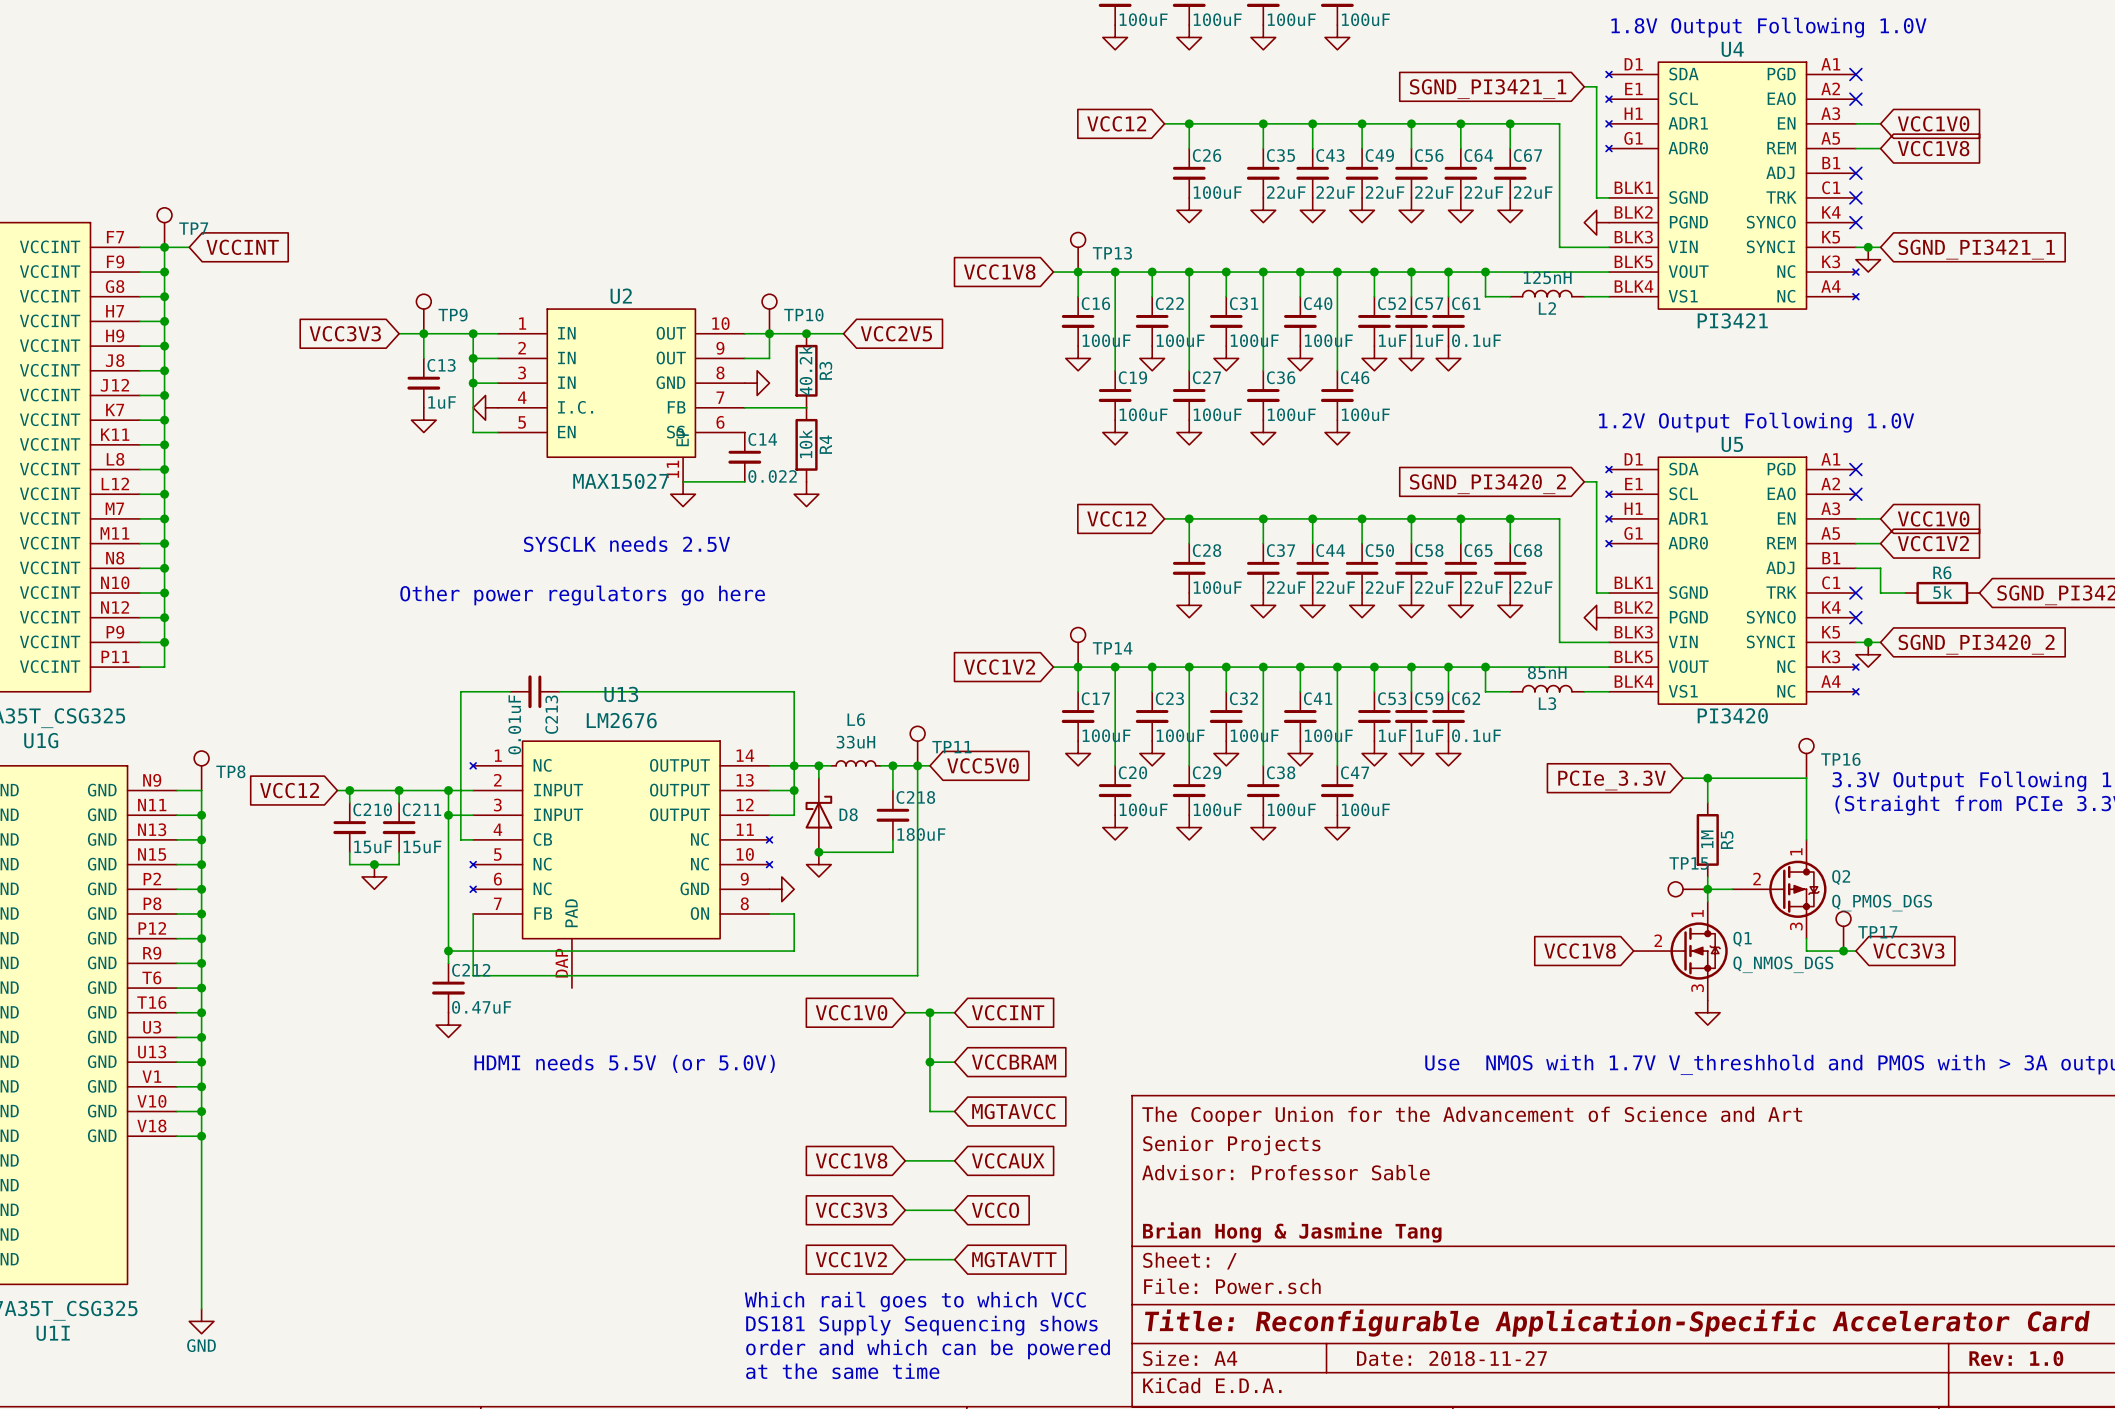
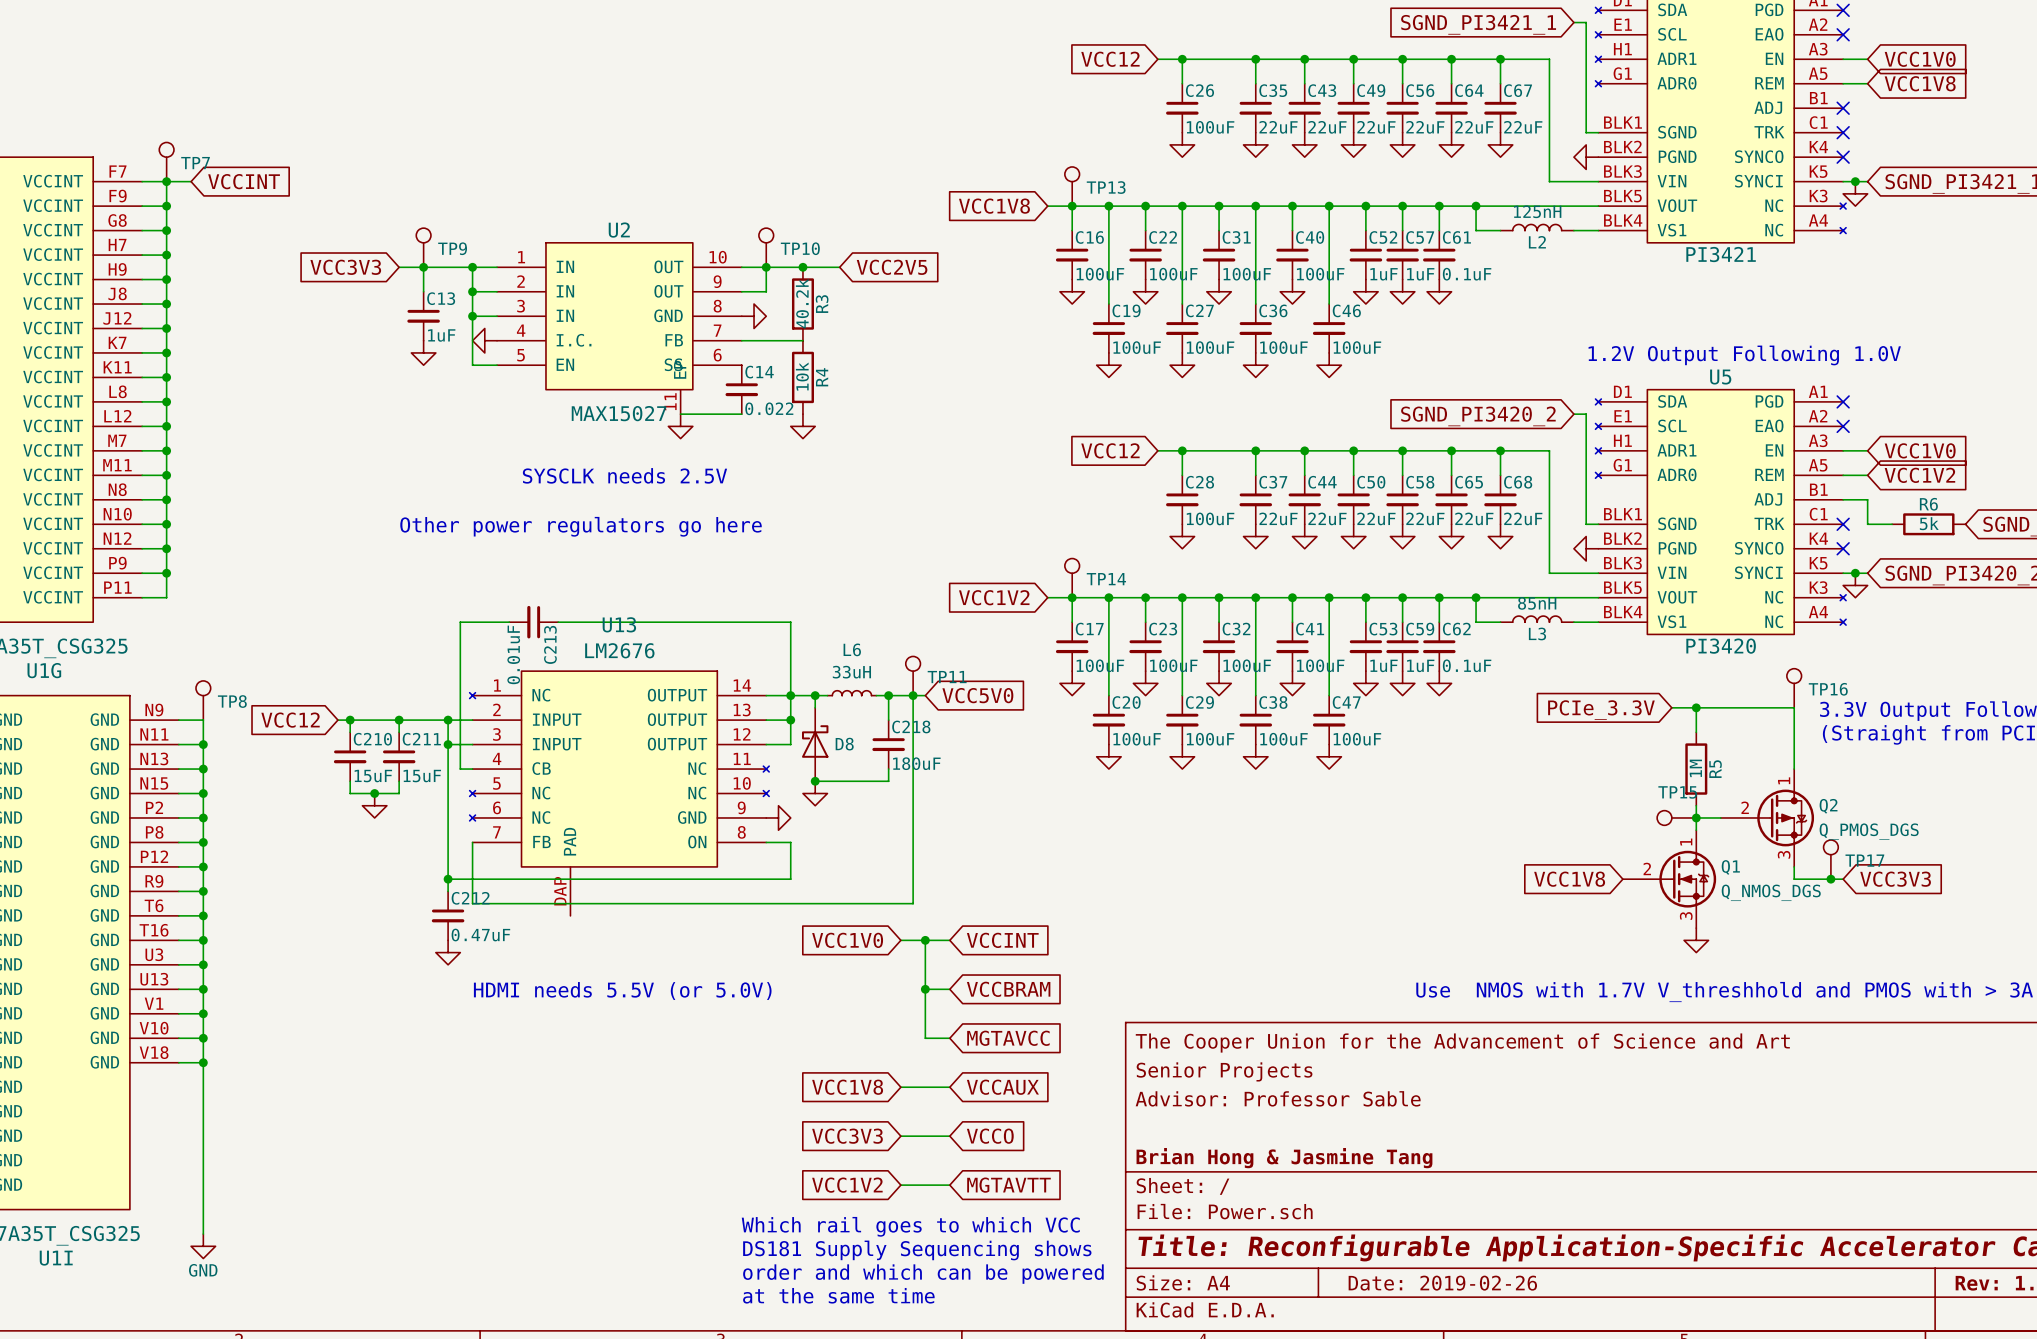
title block: Date: 2018-11-27 (1451, 1358) -> Date: 2019-02-26 (1442, 1283)

